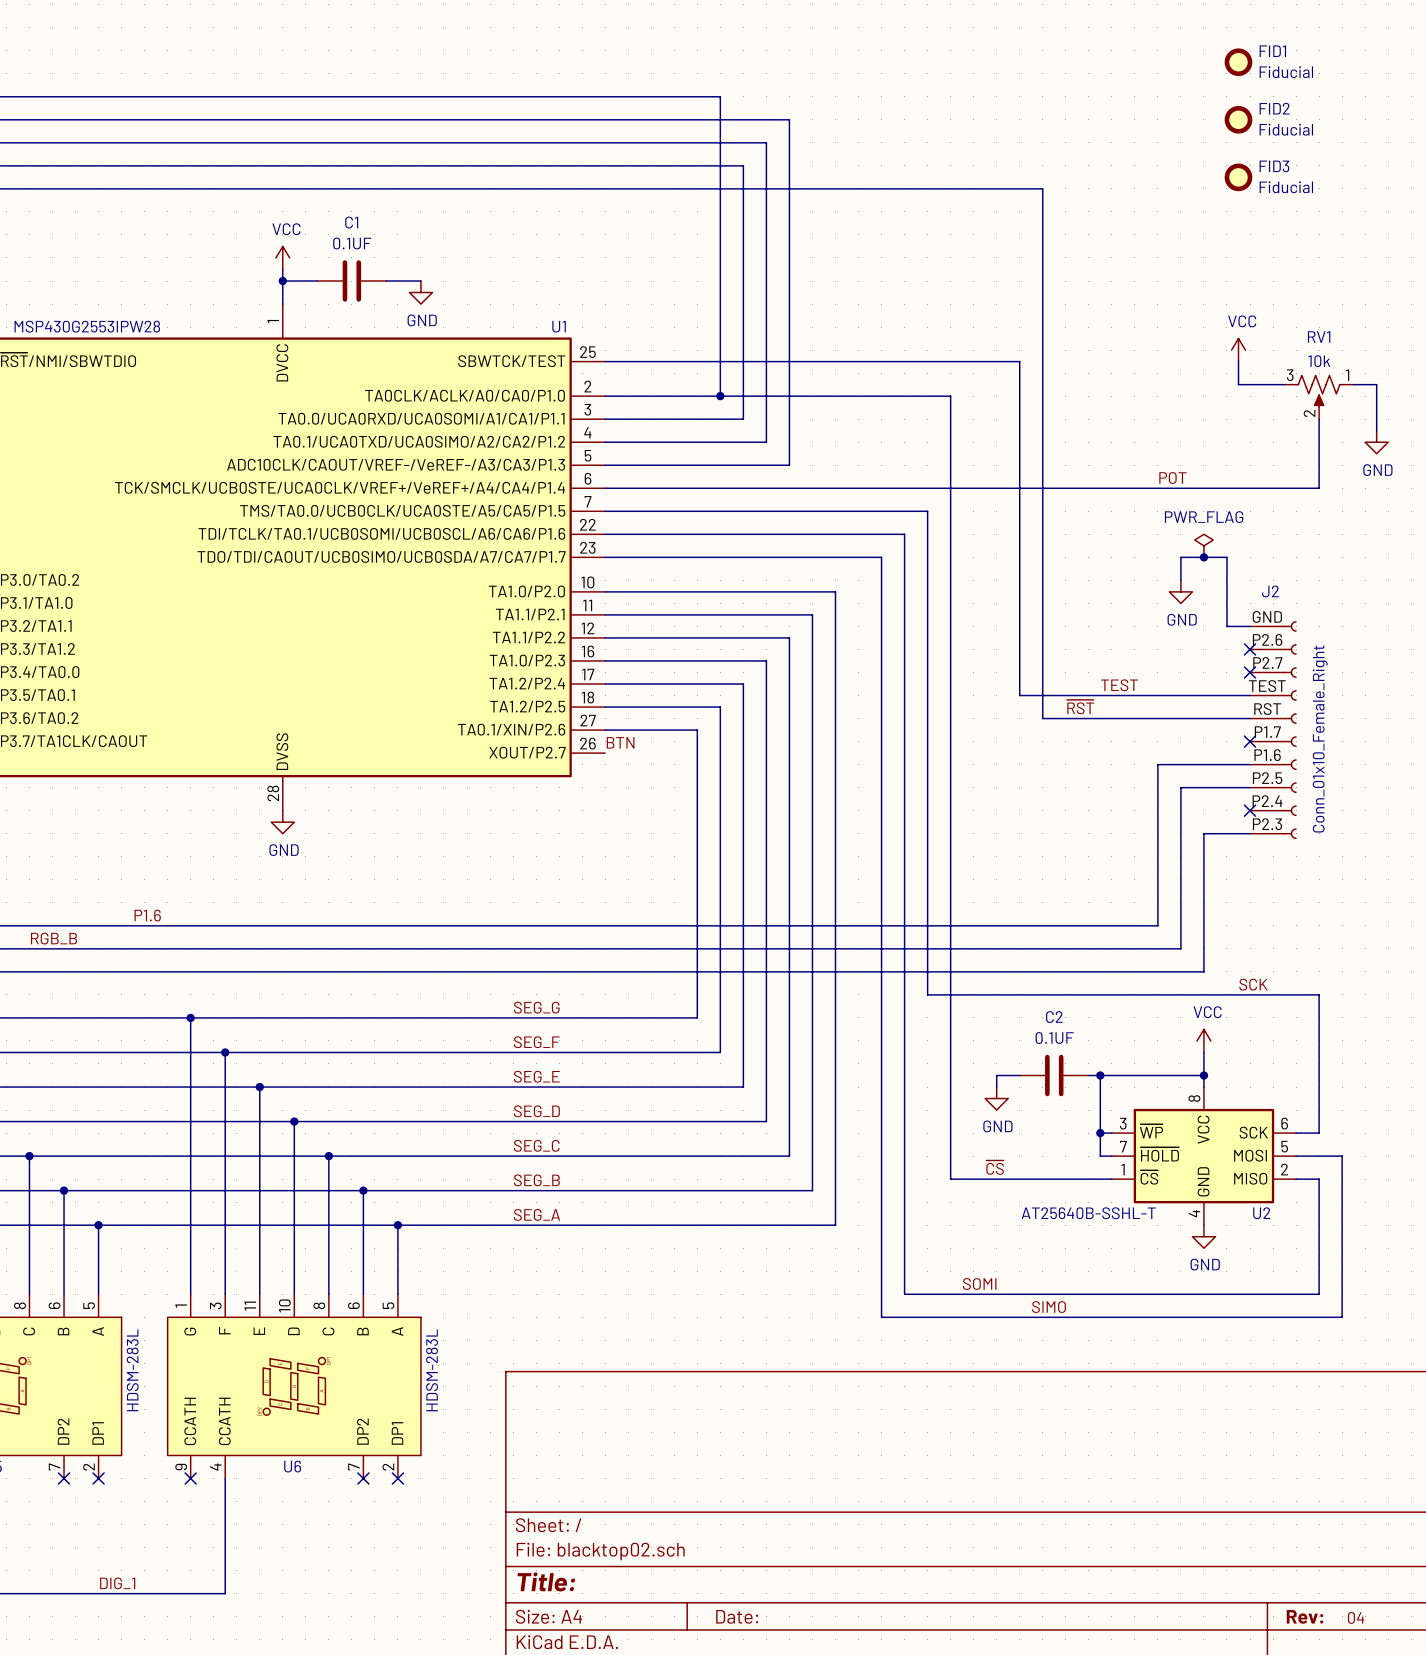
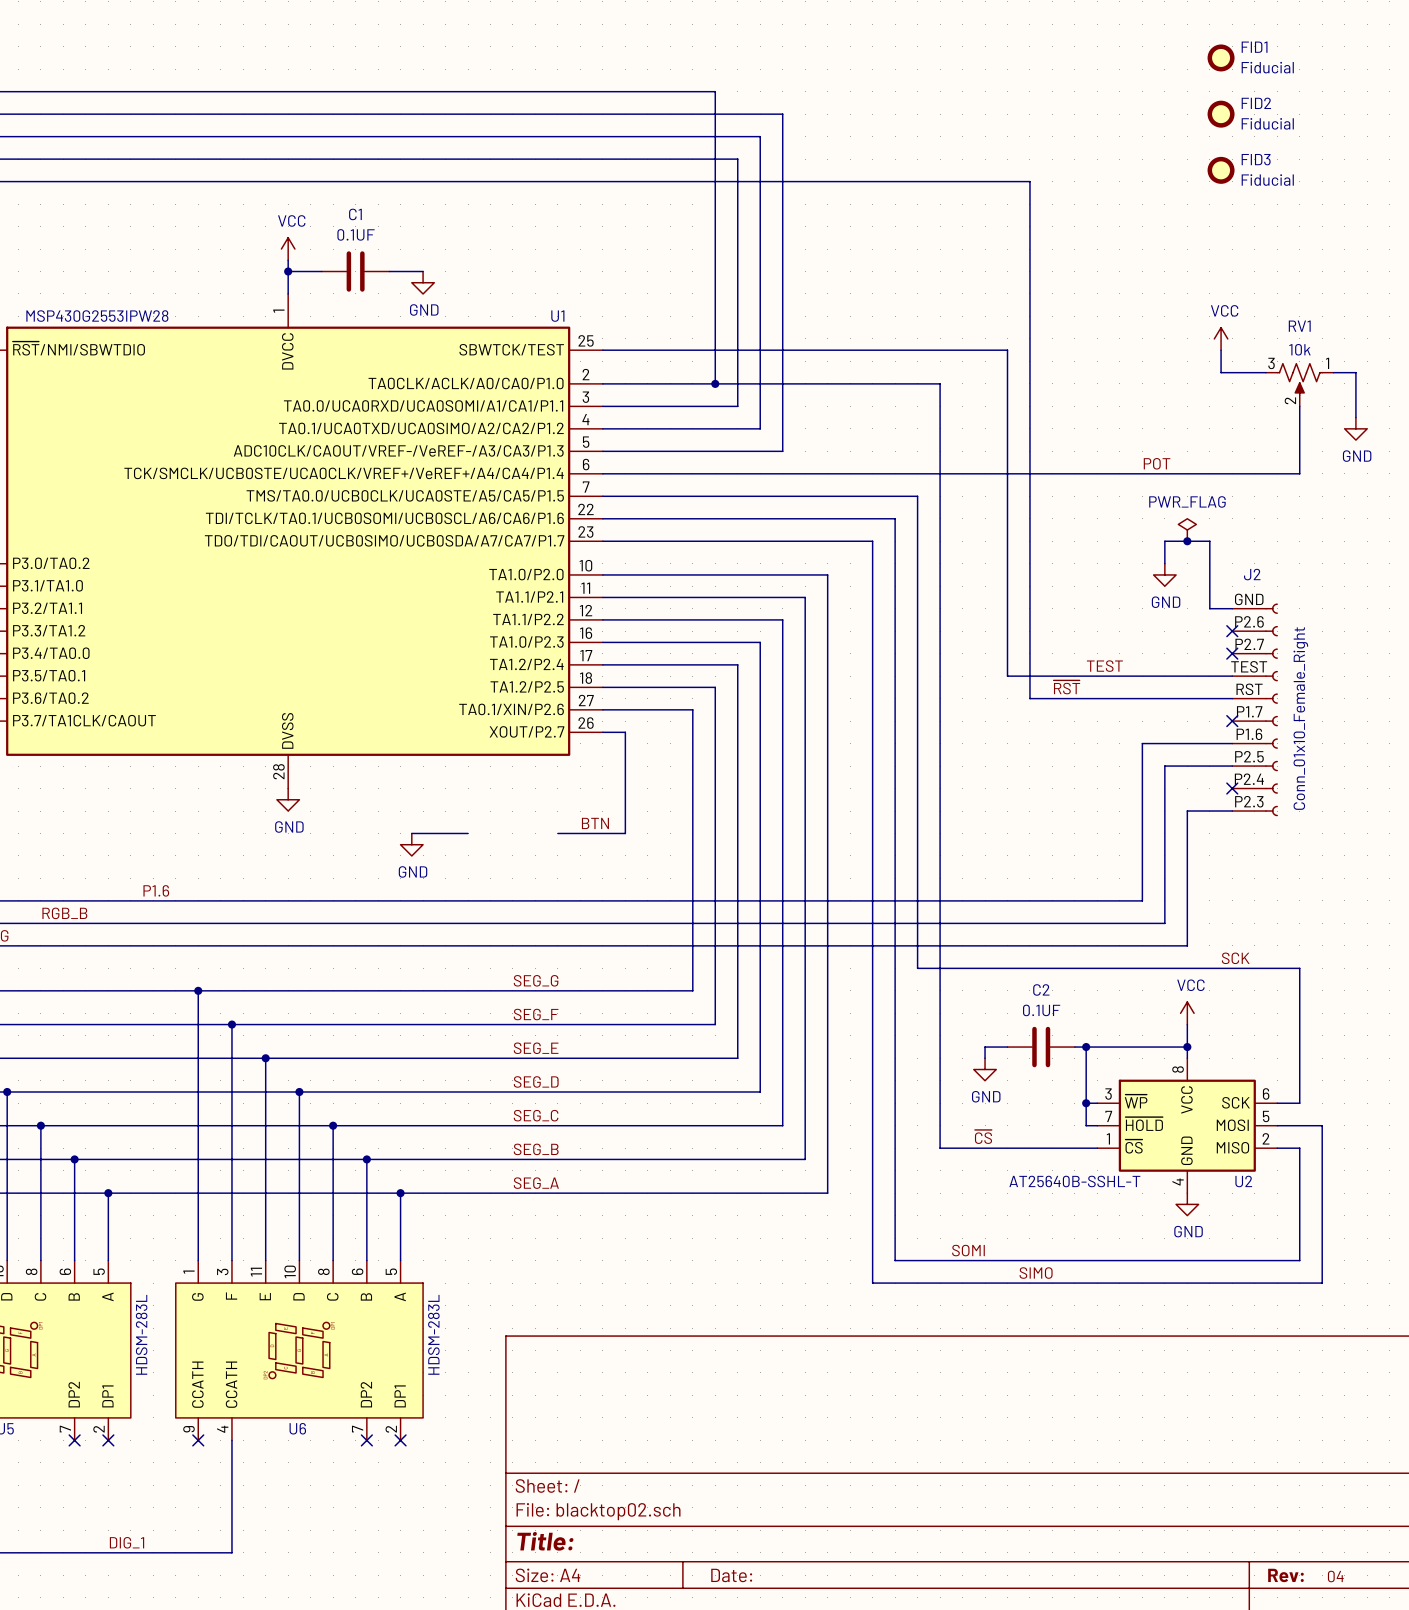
label position: BTN (620, 742) -> BTN (595, 823)
wire: none -> (602, 732) (625, 732) (625, 833) (557, 833)
wire: none -> (411, 833) (468, 833)
power symbol: none -> GND (411, 844)

